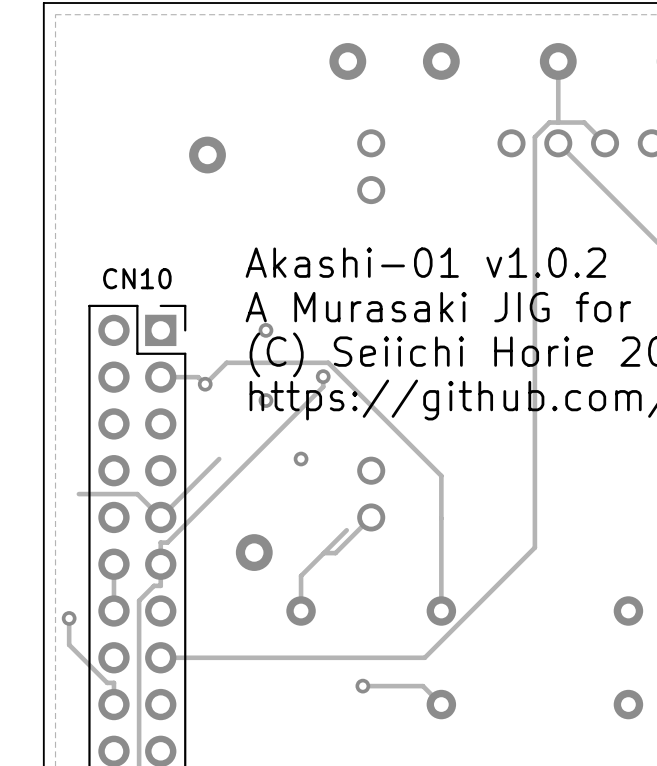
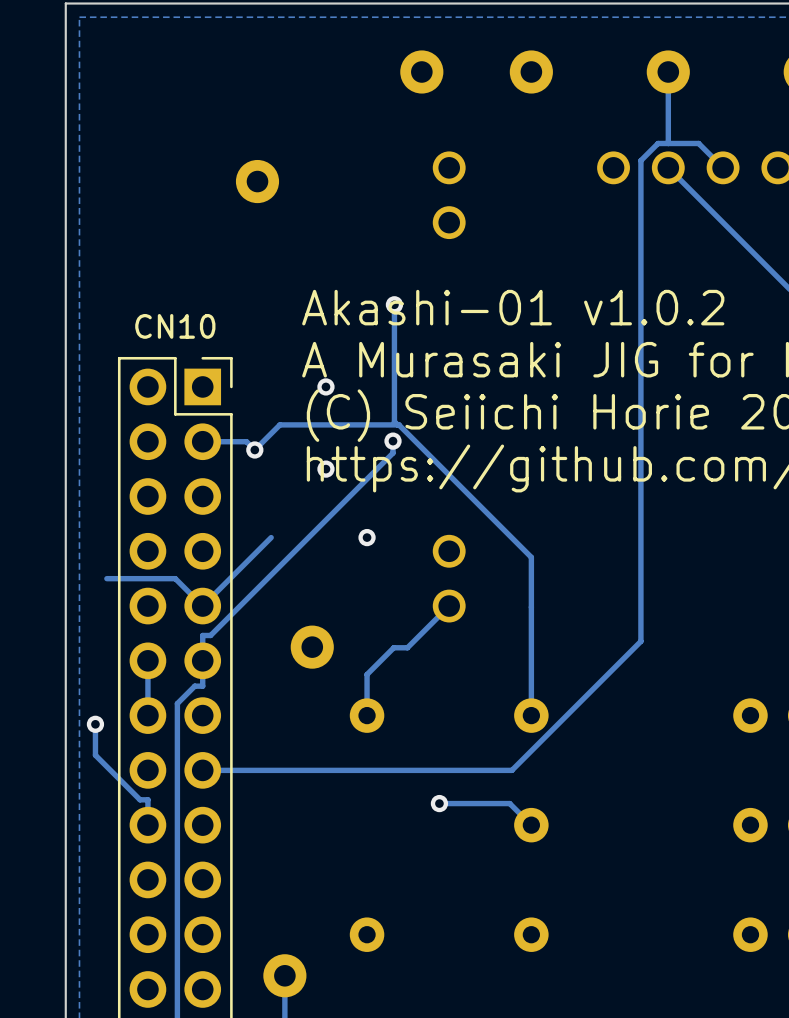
track: none -> (394, 304) (394, 421) (397, 424)
via: none -> (394, 304)
track: (346, 530) (323, 553) -> none

